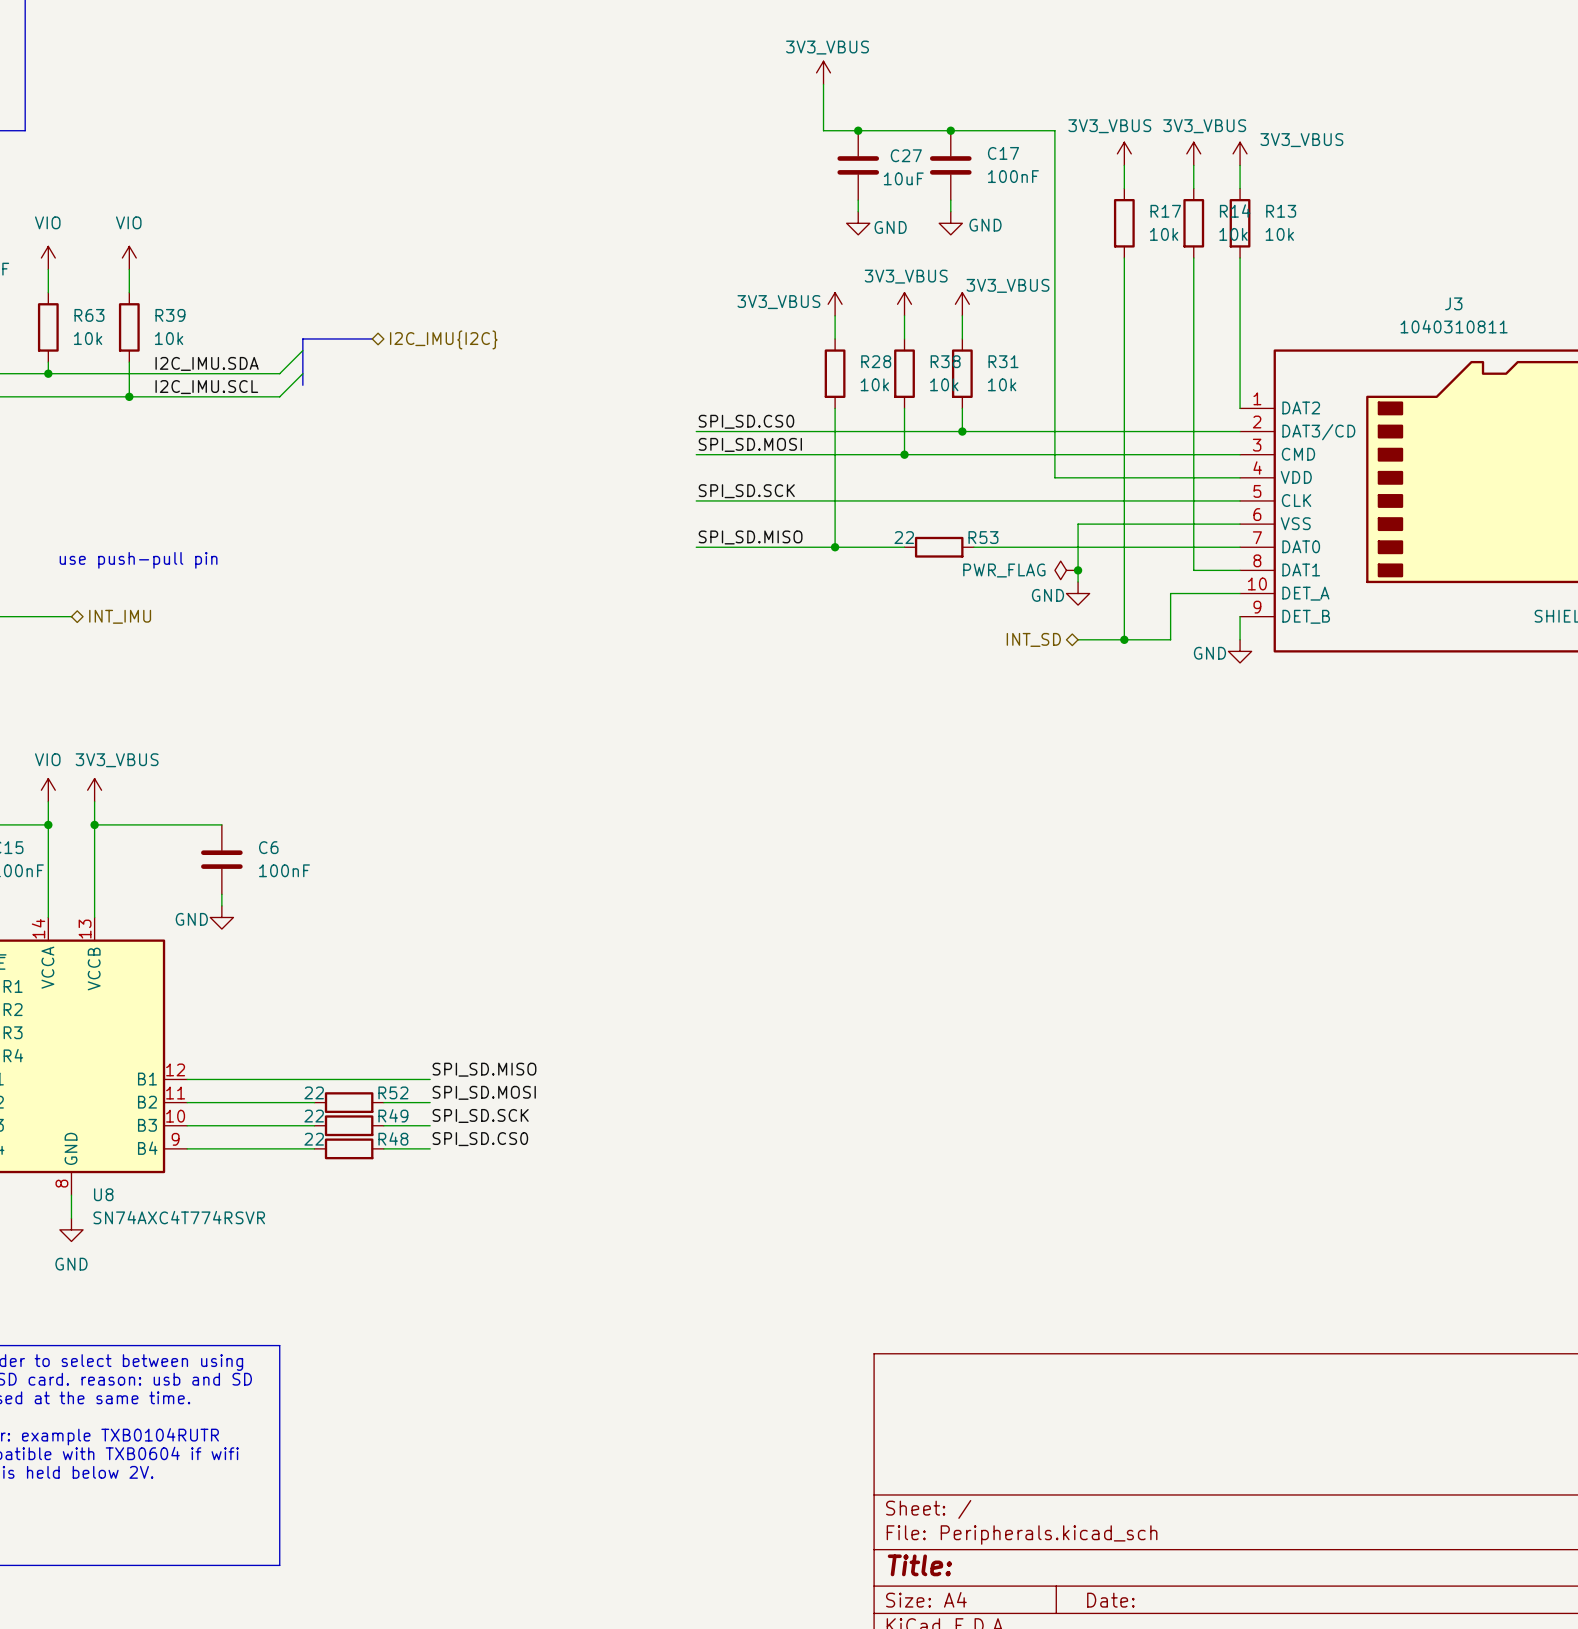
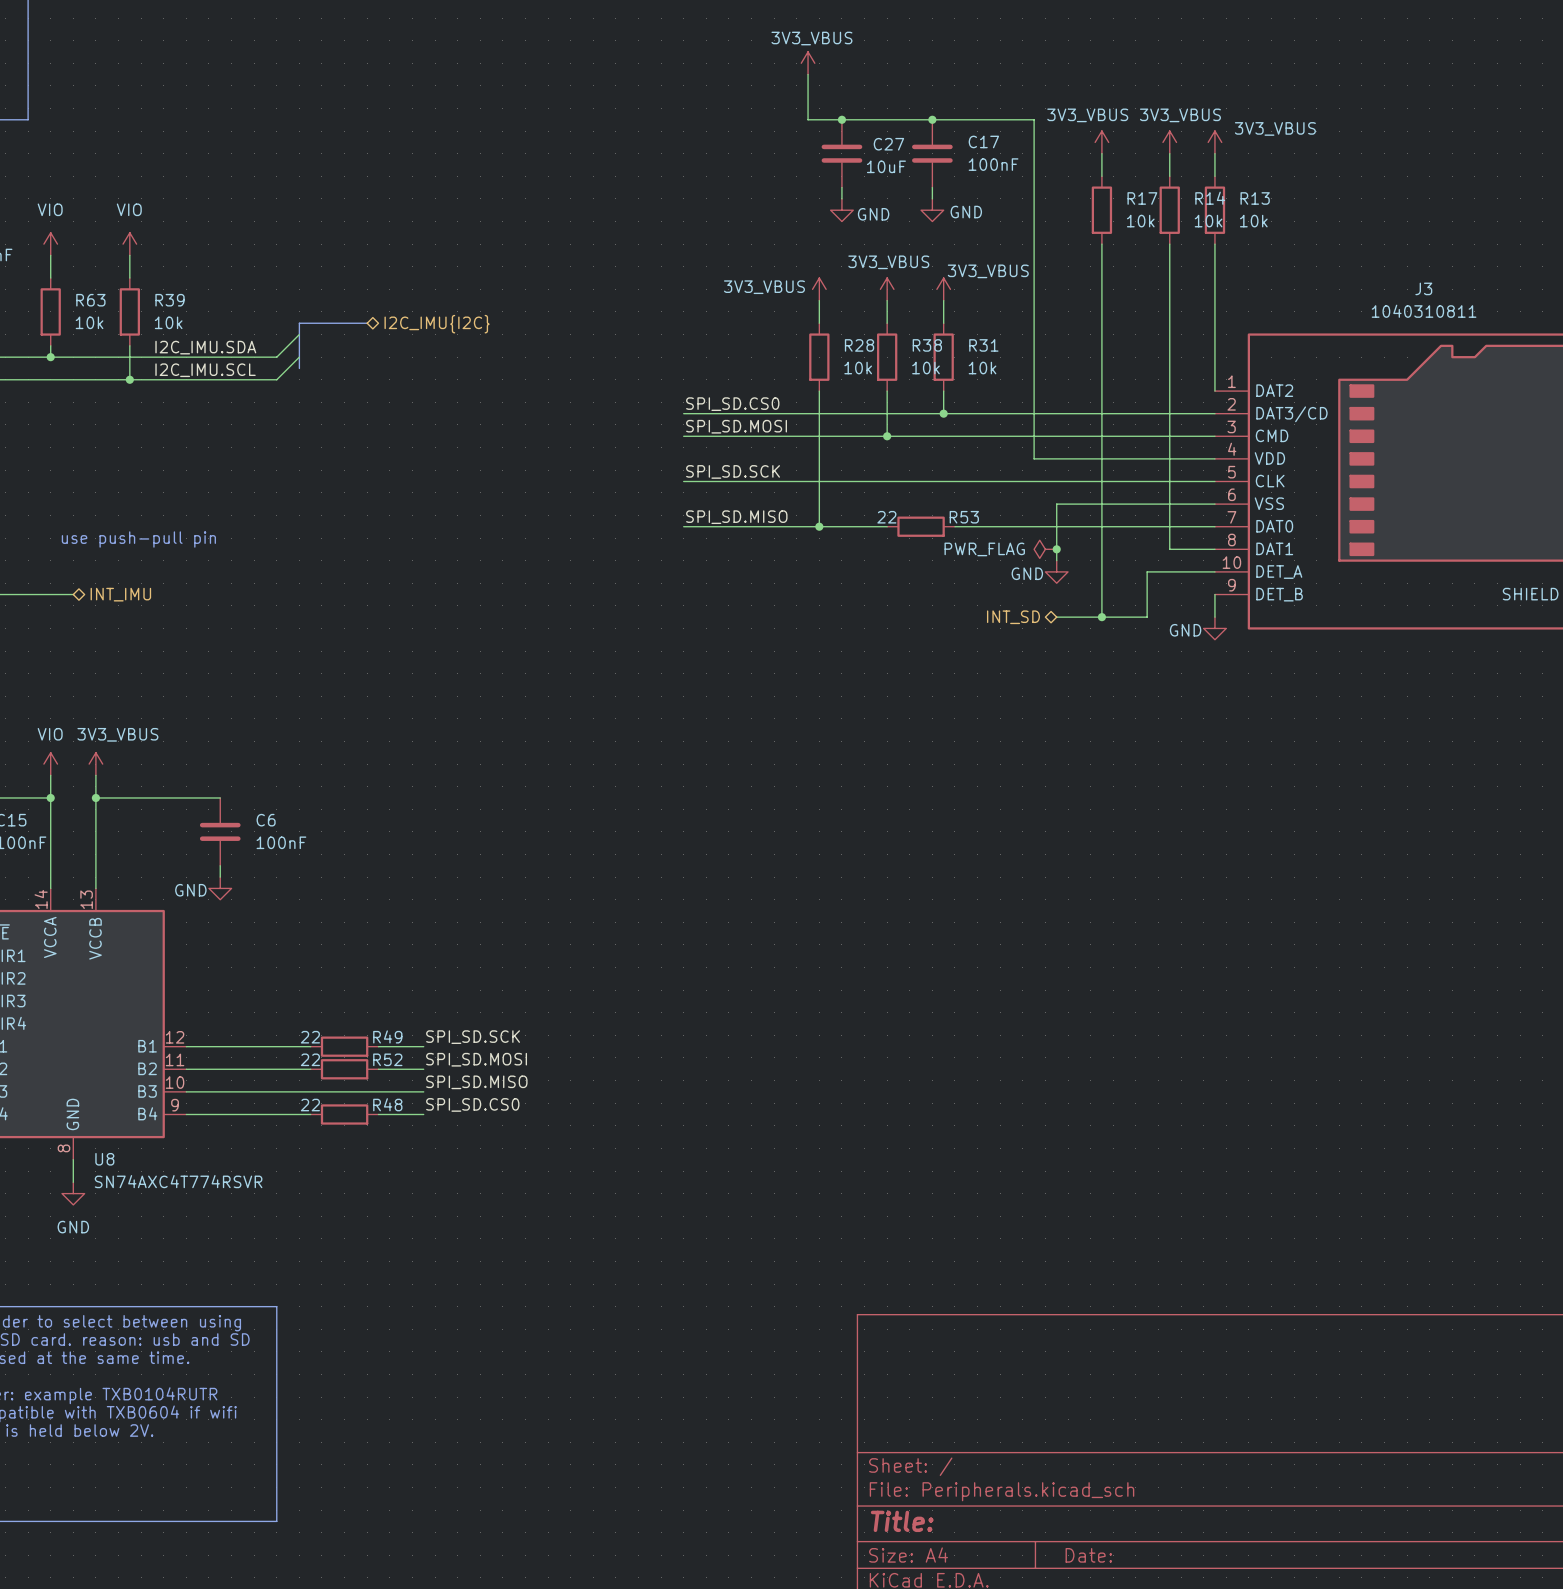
label: SPI_SD.MISO (484, 1069) -> SPI_SD.SCK (473, 1037)
wire: (314, 1079) (383, 1079) -> (310, 1091) (378, 1091)
label: SPI_SD.SCK (480, 1115) -> SPI_SD.MISO (476, 1082)
R49 position: (349, 1125) -> (344, 1046)

